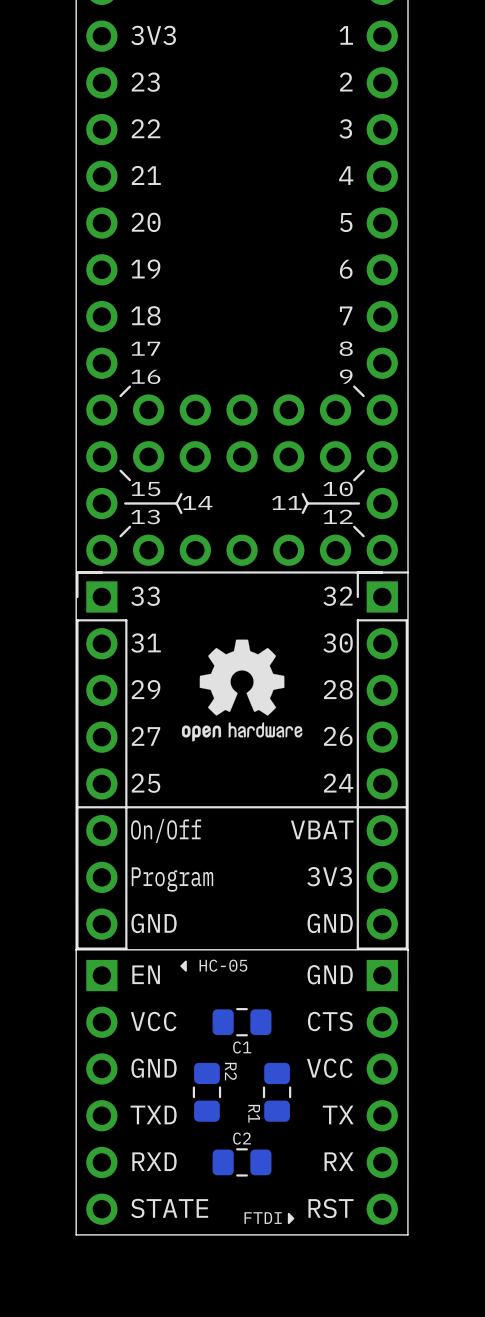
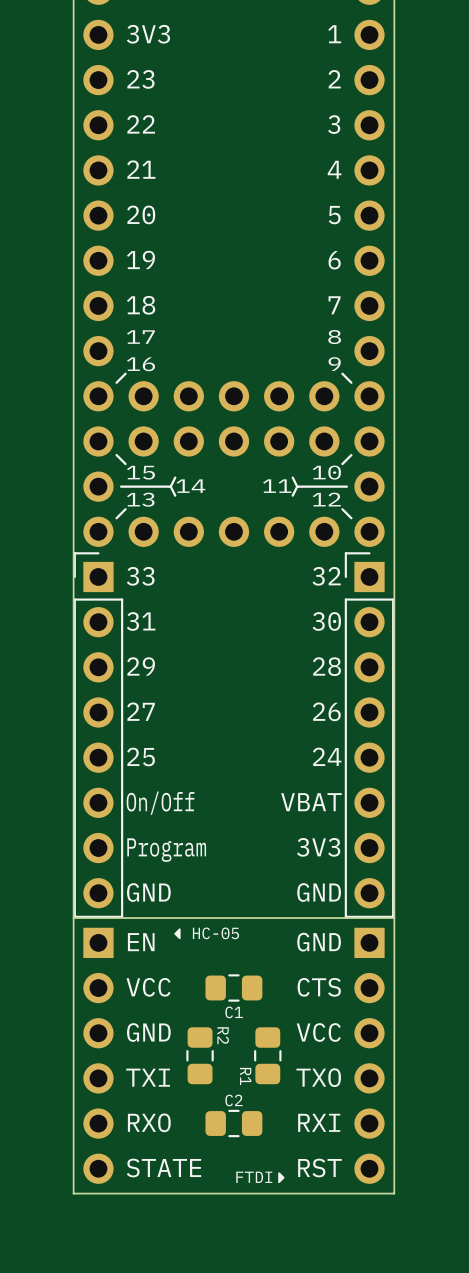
line: (408, 572) (78, 572) -> none
drawing: [181, 639, 303, 742] -> none
line: (406, 807) (77, 807) -> none
text: TXD (153, 1114) -> TXI (148, 1077)
text: TX (338, 1114) -> TXO (318, 1077)
text: RXD (154, 1161) -> RXO (149, 1122)
text: RX (339, 1161) -> RXI (319, 1122)

